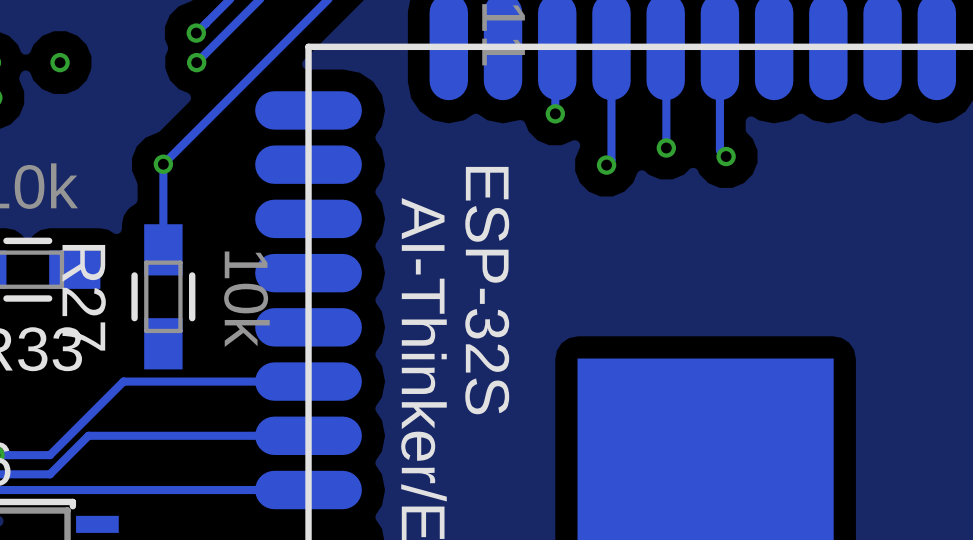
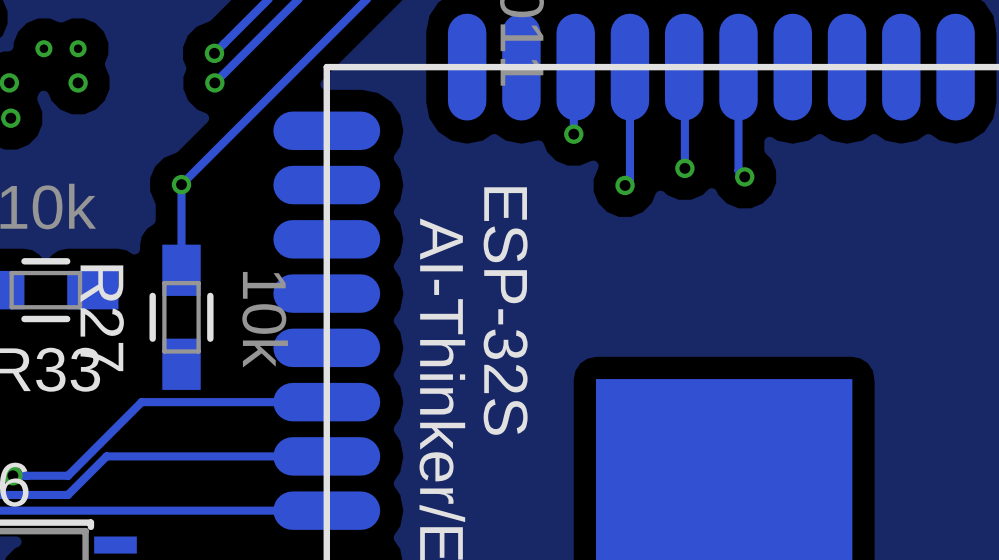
via: none -> (43, 48)
via: none -> (78, 48)

